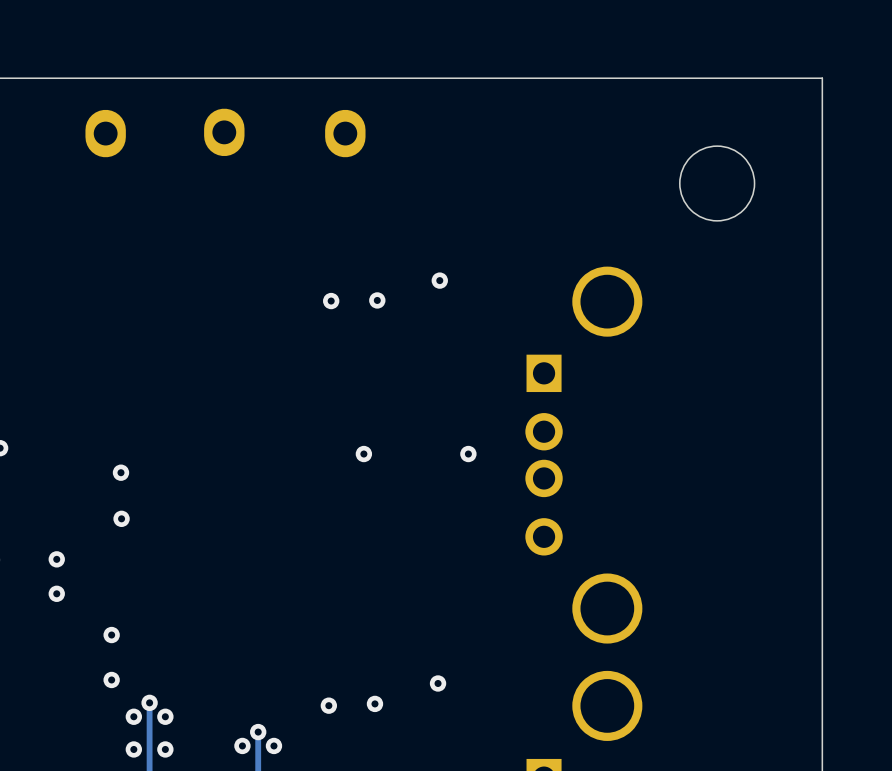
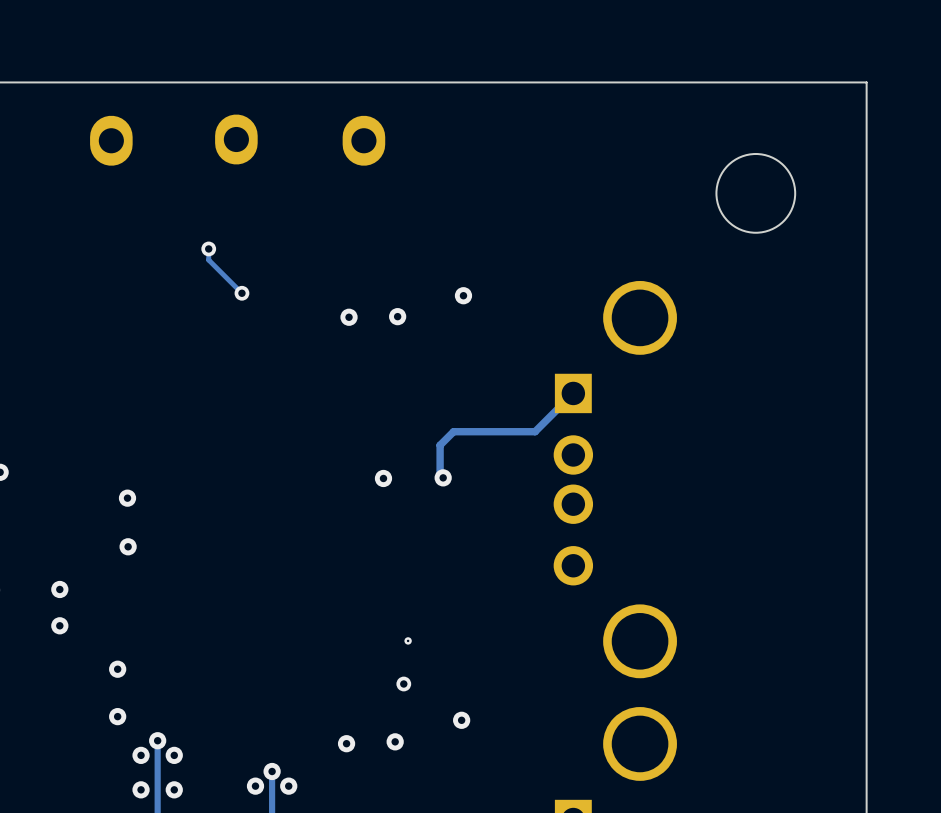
track: none -> (208, 248) (208, 260) (241, 293)
via: none -> (208, 248)
via: none -> (241, 293)
track: none -> (573, 393) (535, 431) (453, 431) (440, 445) (440, 474) (443, 477)
via position: (468, 454) -> (443, 477)
via: none -> (408, 640)
via: none -> (403, 684)

